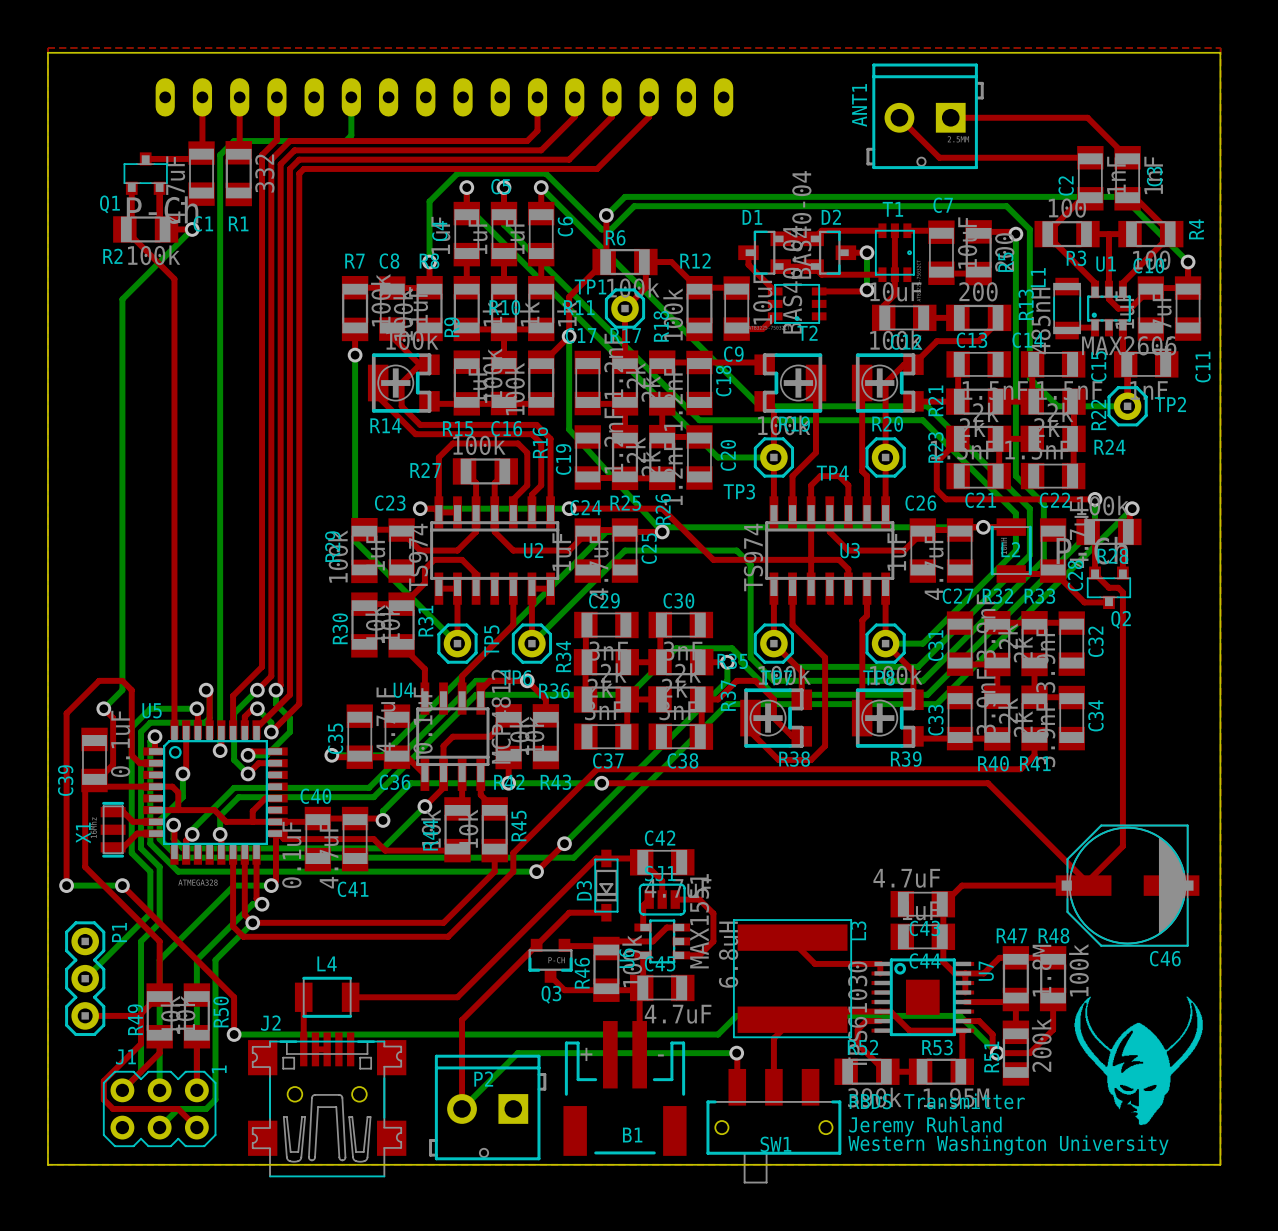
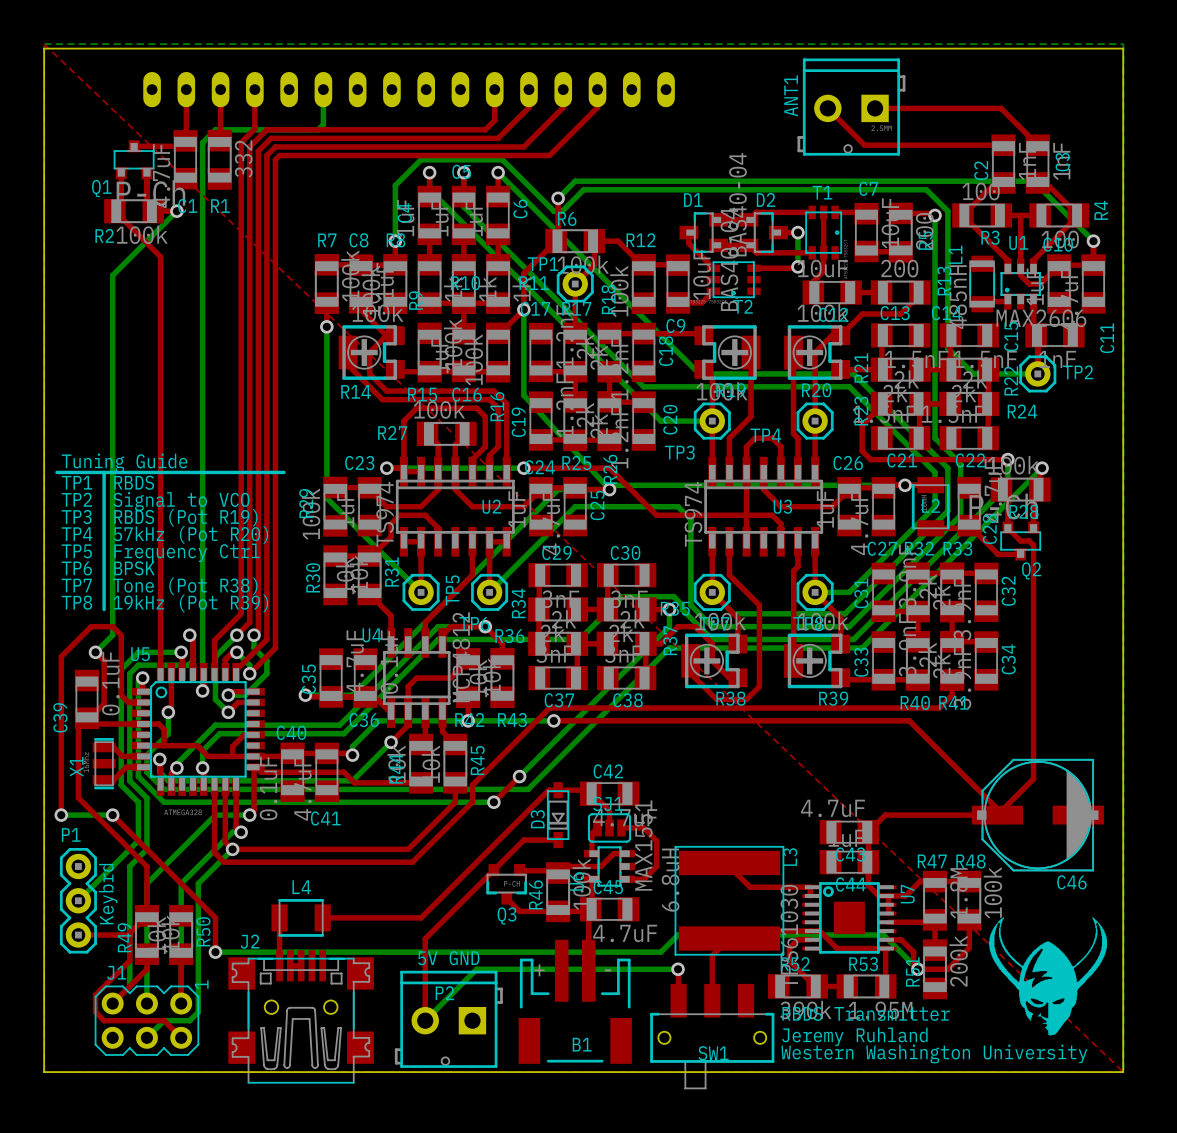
top zone outline: (47, 47) (1220, 47) (1220, 1164) -> (44, 44) (1123, 1072)
text: none -> Tuning Guide (124, 462)
line: none -> (57, 472) (284, 472)
line: none -> (104, 472) (104, 609)
text: none -> TP1 (76, 482)
text: none -> RBDS (134, 482)
text: none -> TP2 (76, 499)
text: none -> Signal to VCO (181, 501)
text: none -> TP3 (76, 517)
text: none -> RBDS (Pot R19) (185, 517)
text: none -> TP4 (77, 534)
text: none -> 57kHz (Pot R20) (191, 534)
text: none -> TP5 (76, 551)
text: none -> Frequency Ctrl (186, 552)
text: none -> TP6 (76, 568)
text: none -> BPSK (134, 568)
text: none -> TP7 (76, 585)
text: none -> Tone (Pot R38) (185, 586)
text: none -> TP8 (76, 602)
text: none -> 19kHz (Pot R39) (190, 603)
P1 name rotation: 0° (119, 932) -> 90° clockwise (71, 834)
P1 name position: P1 (119, 932) -> P1 (71, 834)
text: none -> Keybrd (108, 894)
text: none -> 5V GND (448, 958)

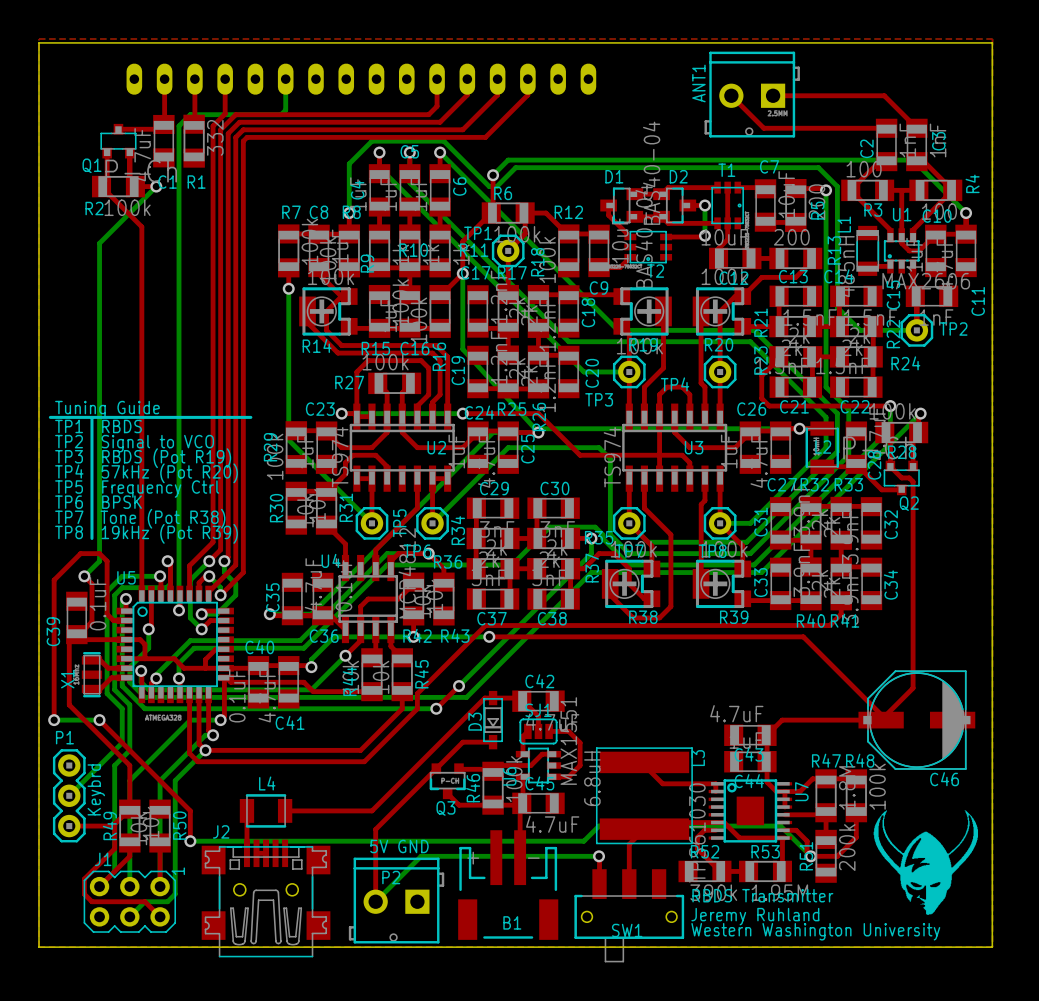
top zone outline: (44, 44) (1123, 1072) -> (39, 39) (992, 39) (992, 947)

